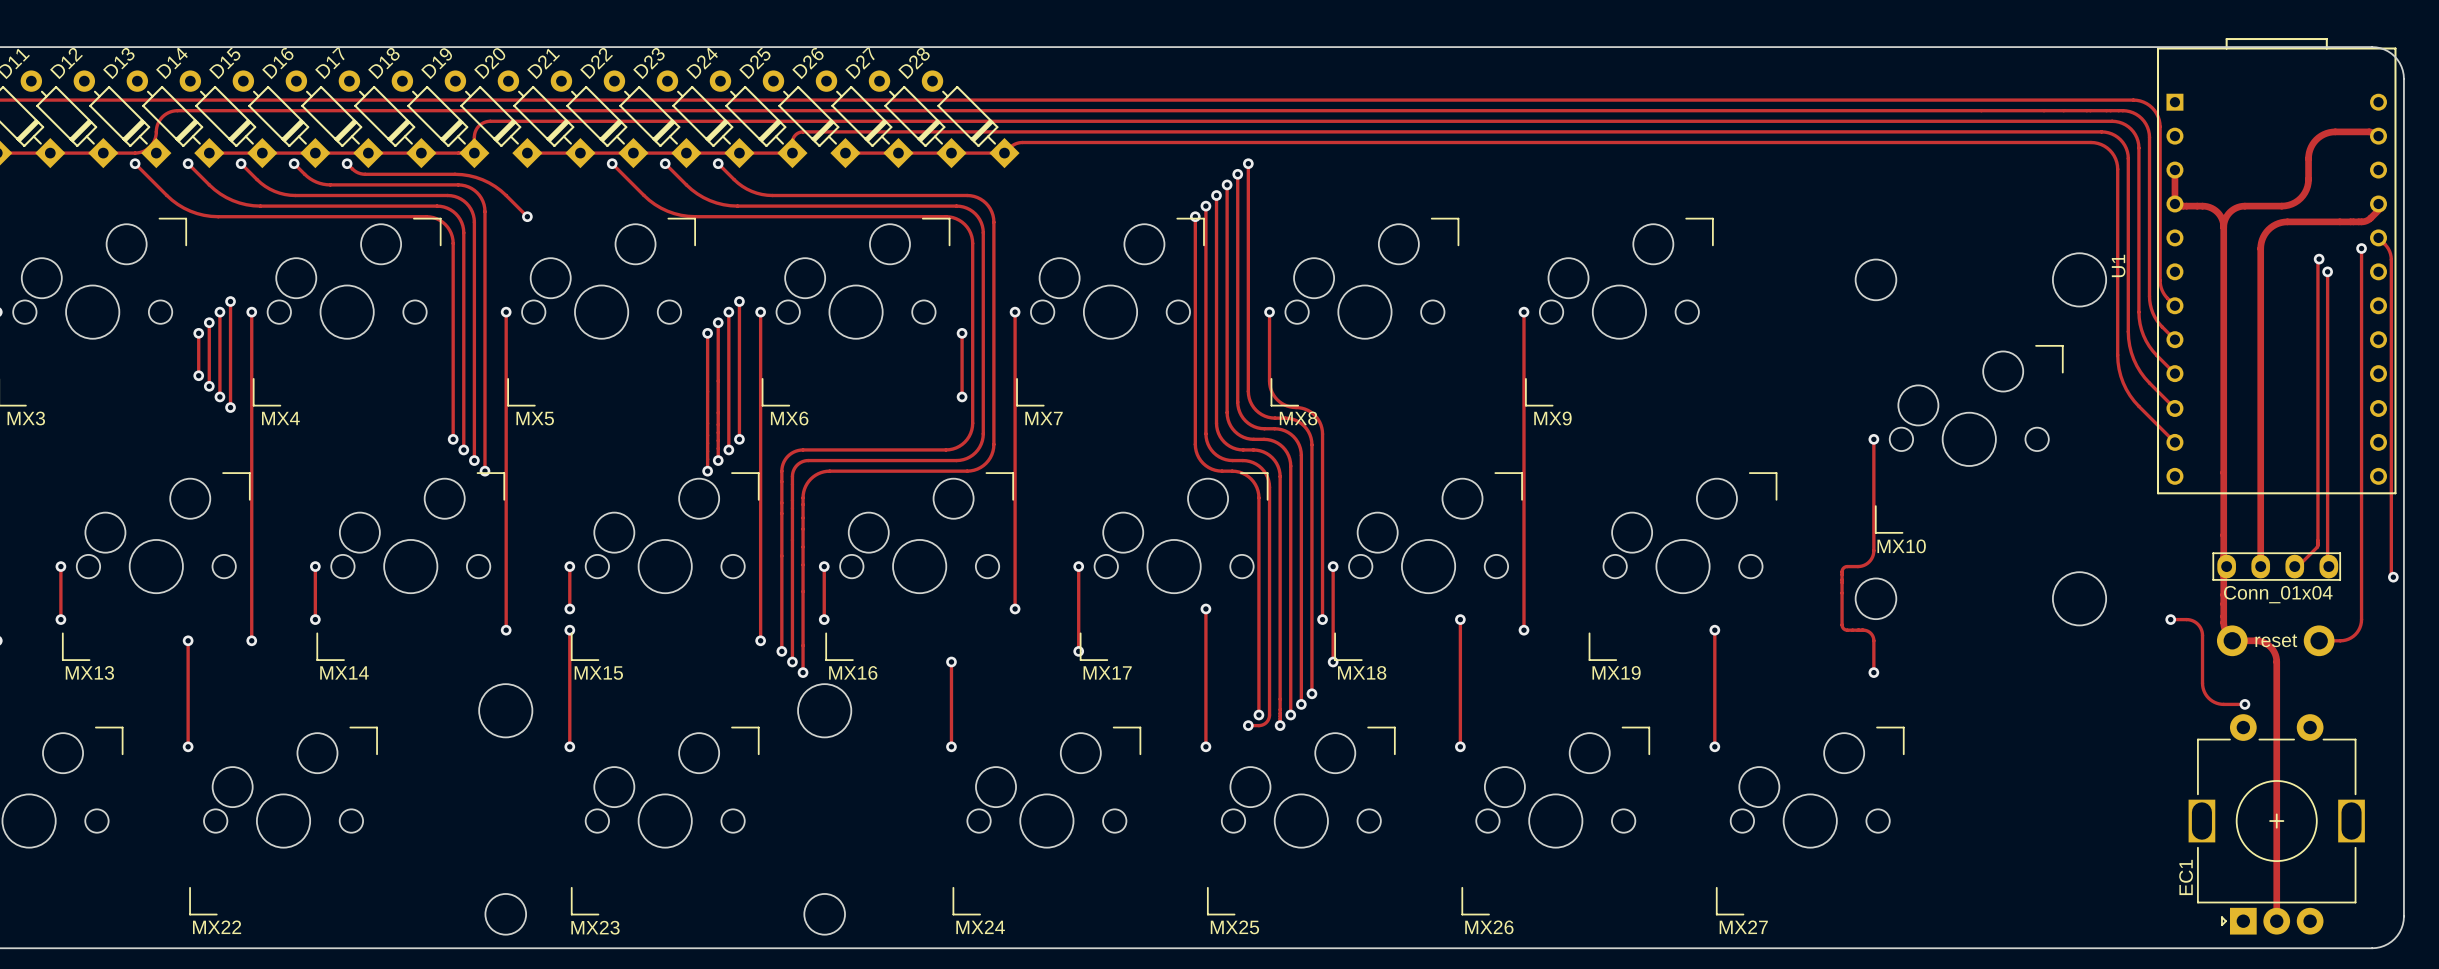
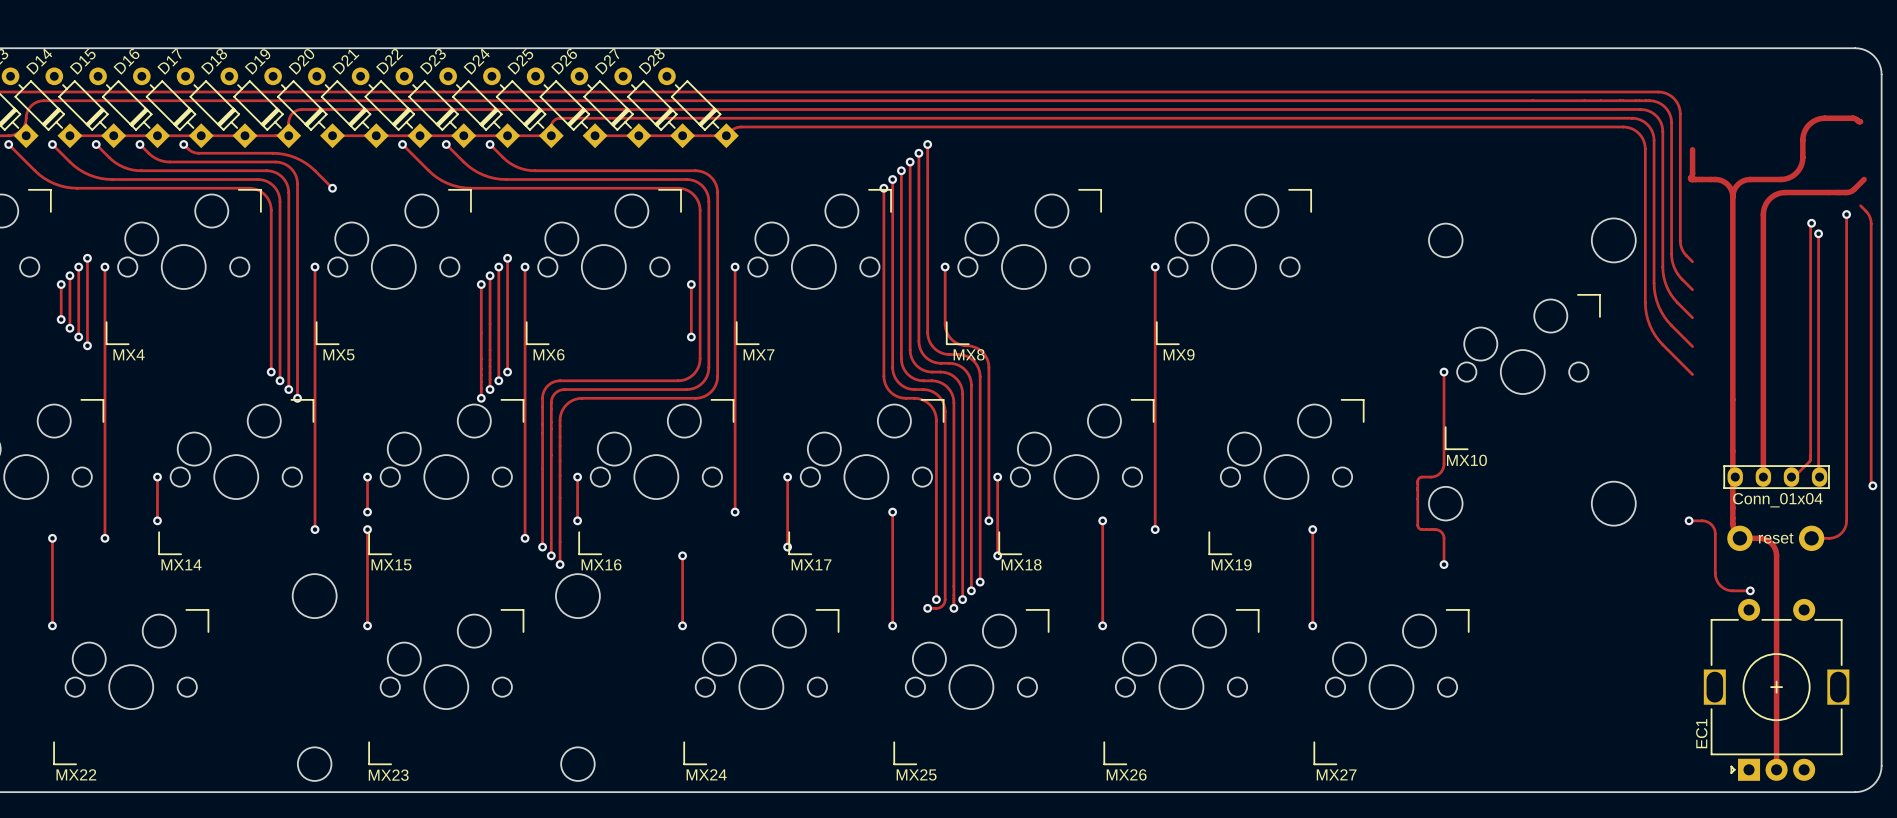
U1: (2276, 266) -> none

